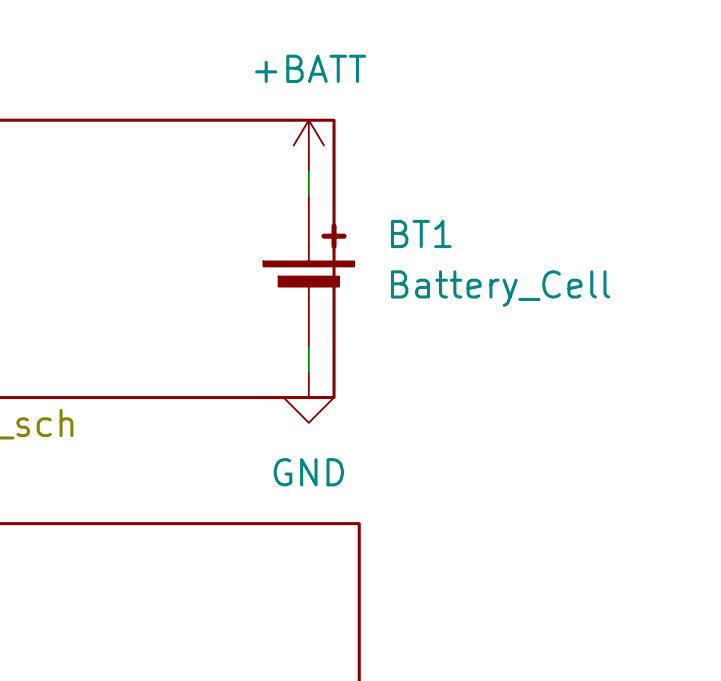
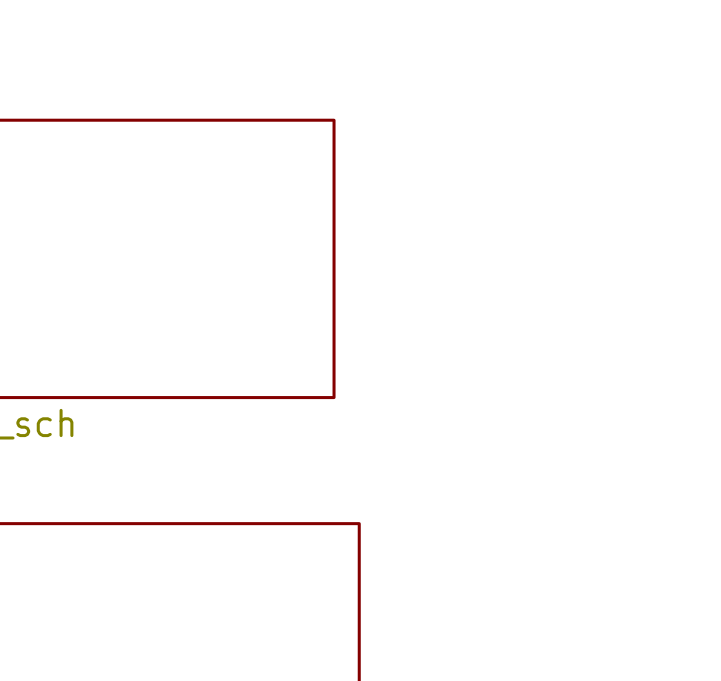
power symbol: +BATT (308, 145) -> none
wire: (308, 170) (308, 195) -> none
BT1: Battery_Cell (308, 271) -> none
wire: (308, 347) (308, 372) -> none
power symbol: GND (308, 397) -> none

